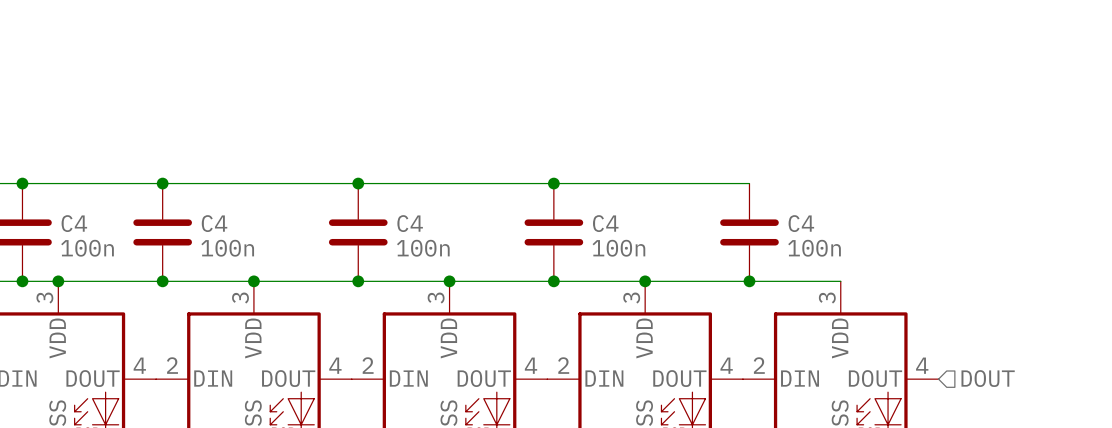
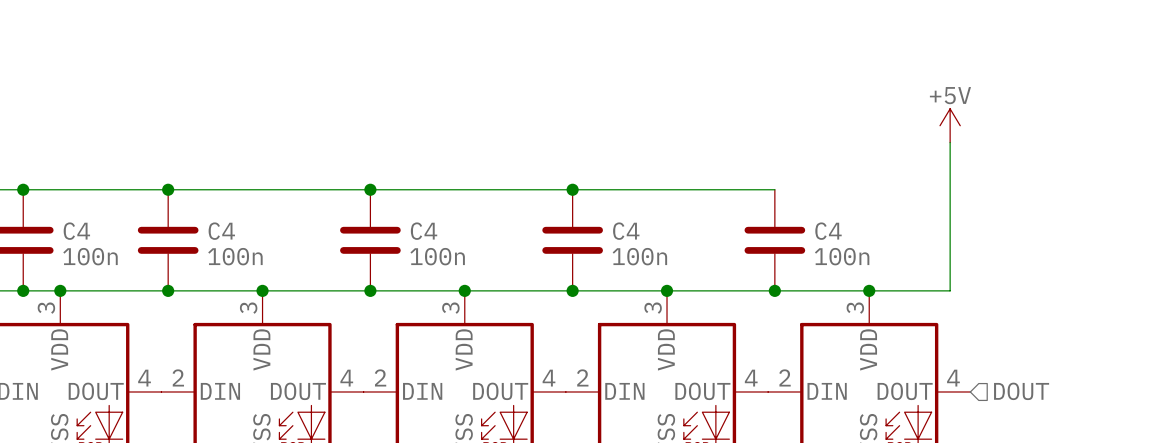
power symbol: none -> +5V (950, 125)
wire: none -> (950, 142) (950, 290) (869, 290)
junction: none -> (869, 290)

